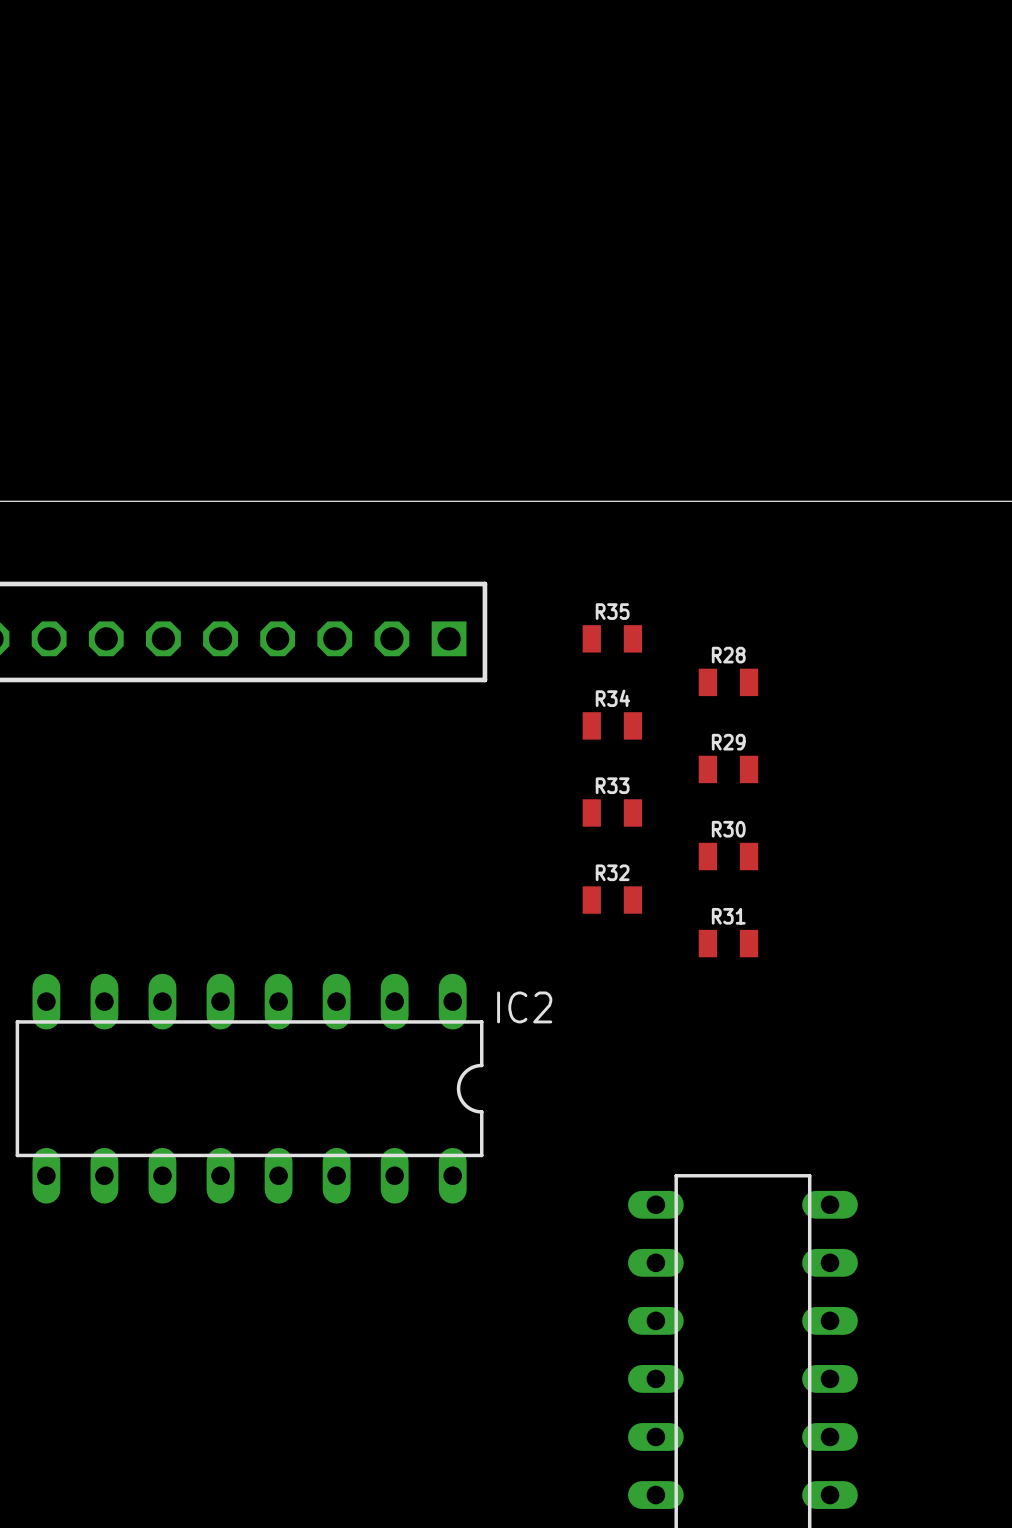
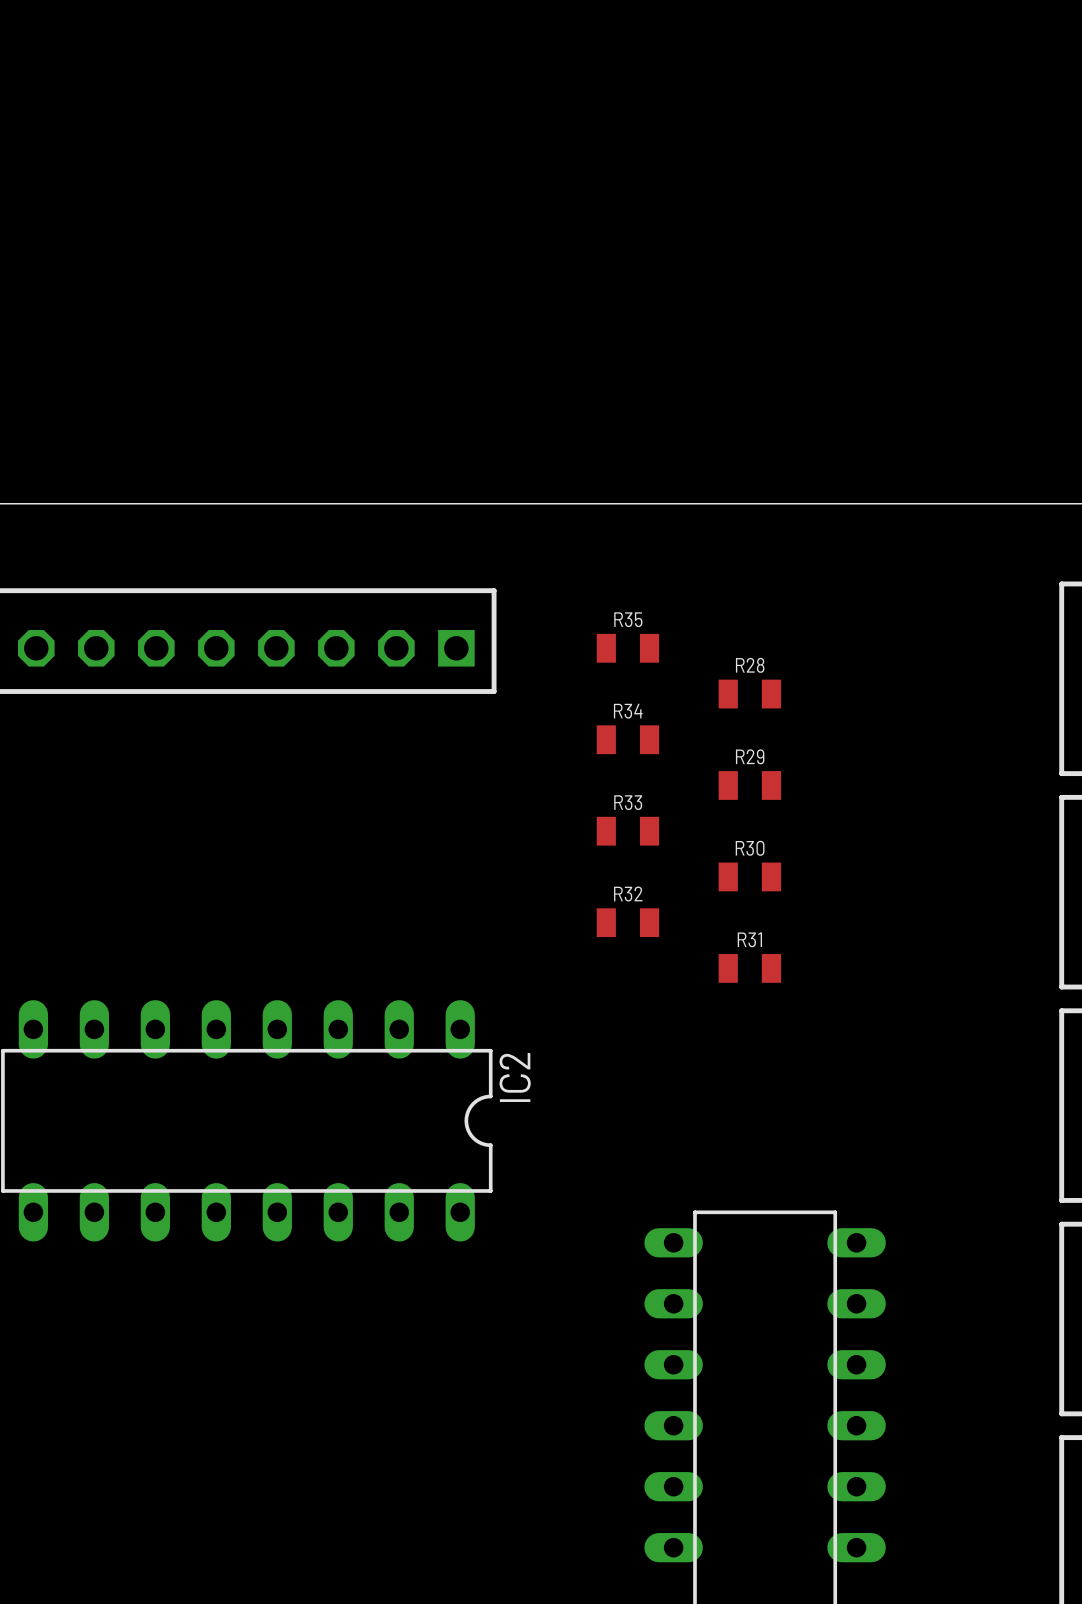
IC2 name rotation: 0° (524, 1007) -> 90° counterclockwise (515, 1077)

